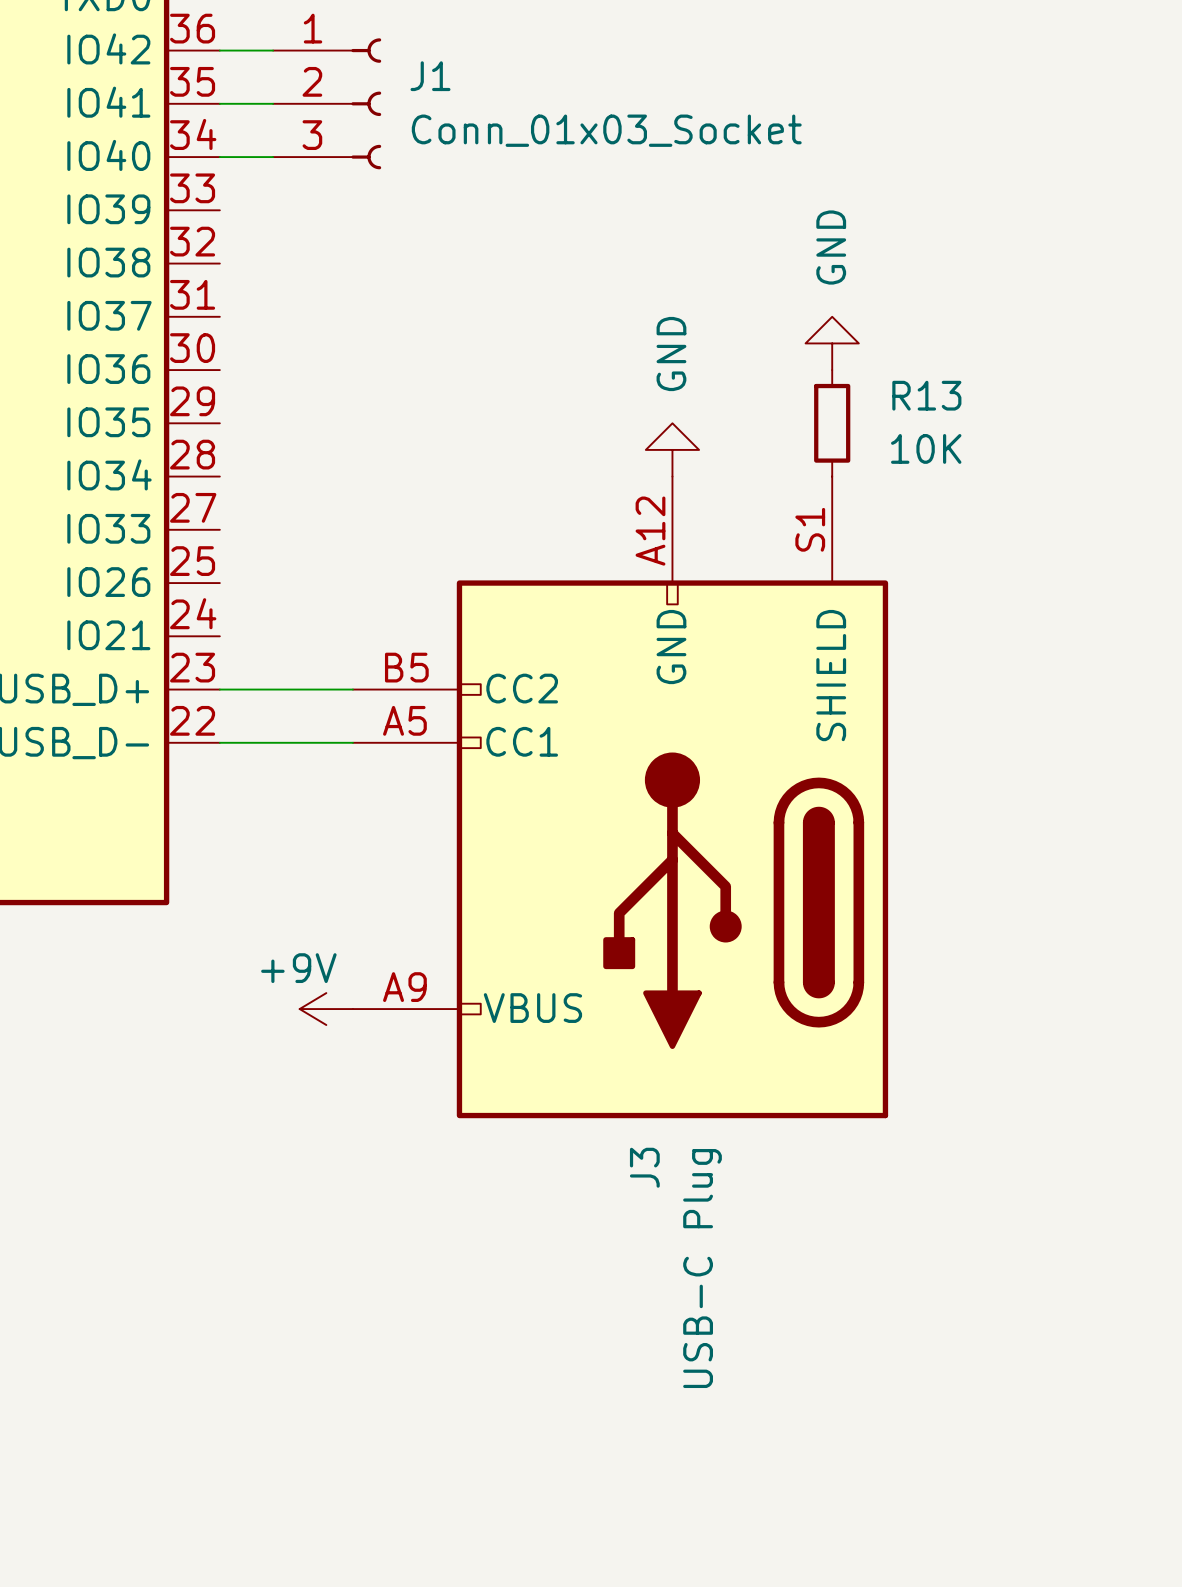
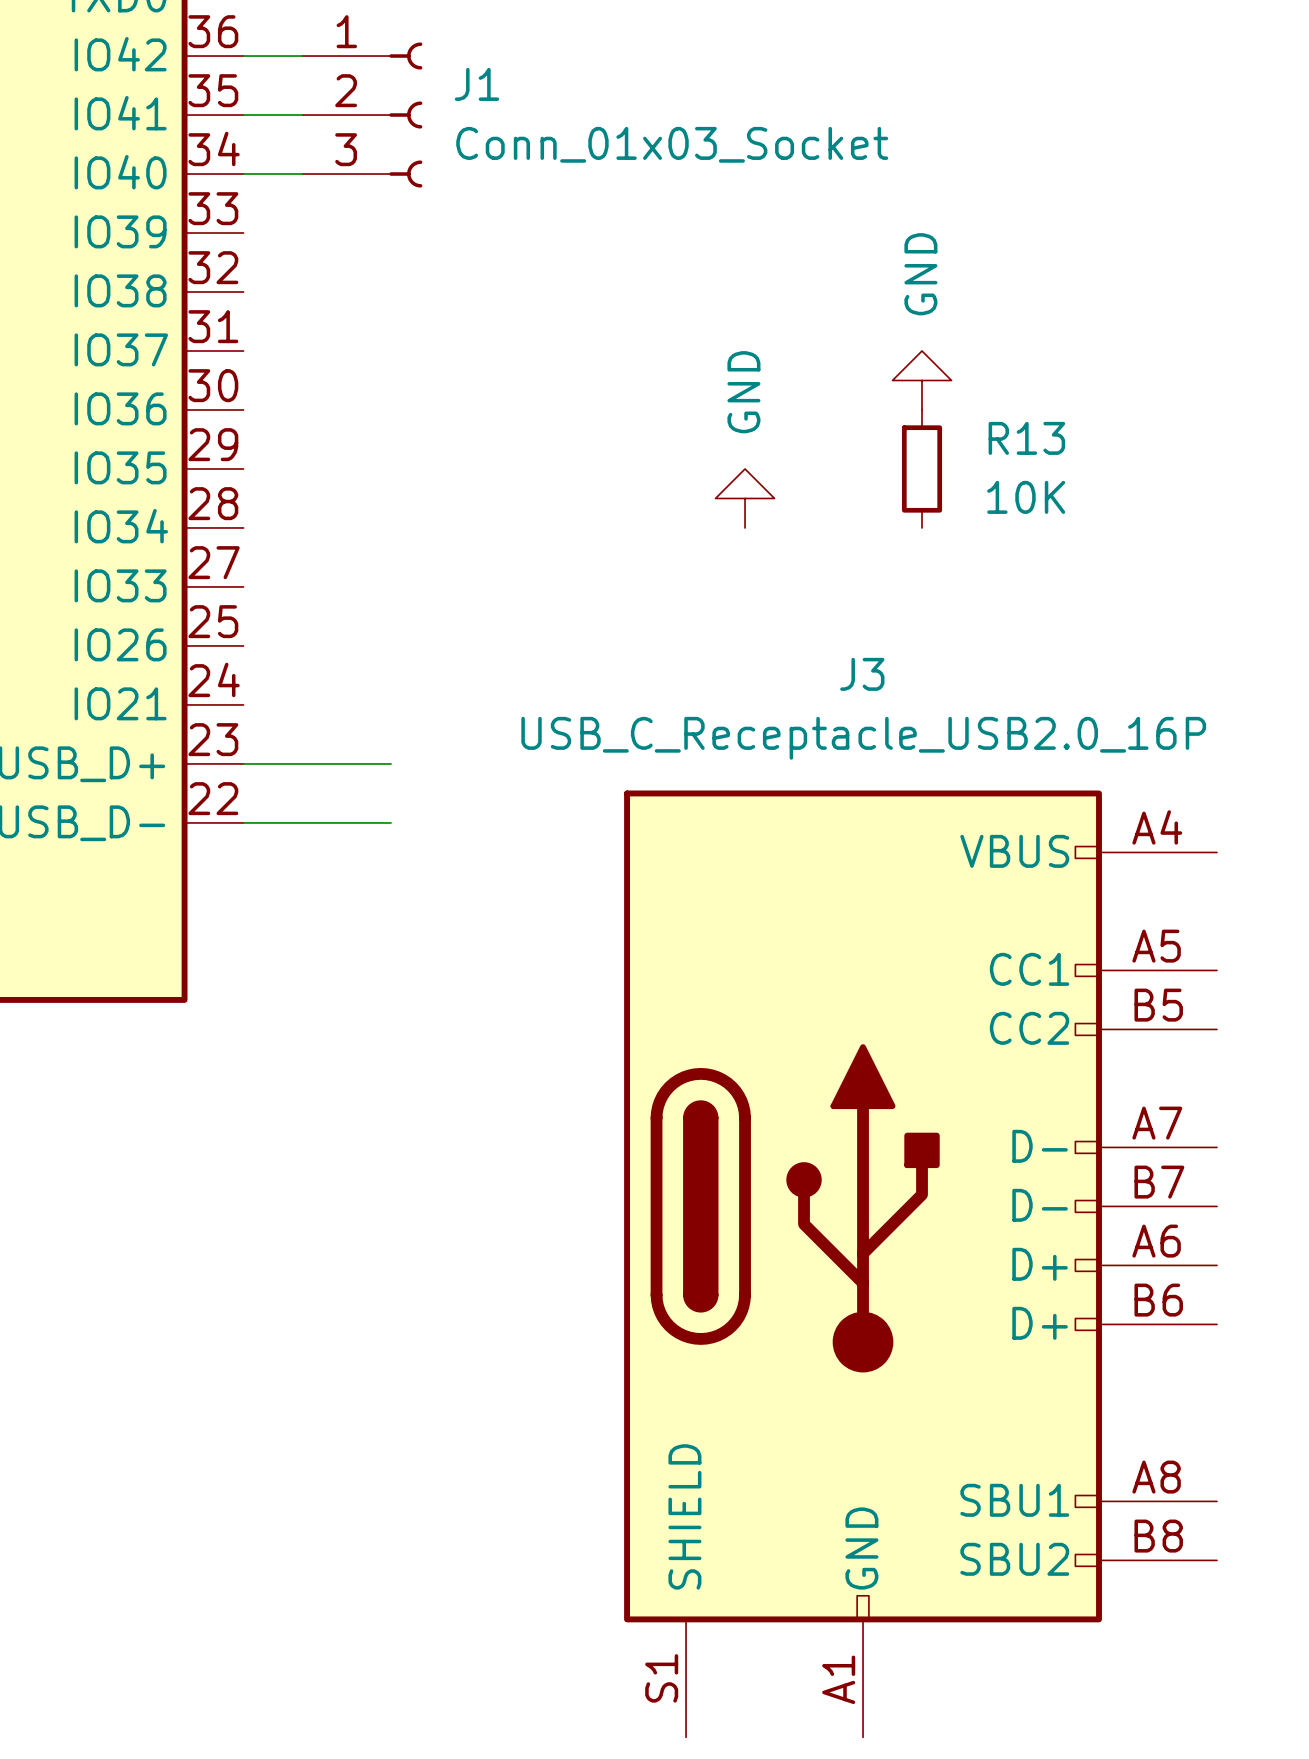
J3 symbol: [352, 476, 889, 1119] -> [624, 790, 1217, 1738]
power symbol: +9V (326, 1009) -> none
J3 name position: J3 (644, 1167) -> J3 (862, 674)
J3 value: USB-C Plug (702, 1268) -> USB_C_Receptacle_USB2.0_16P (863, 738)

